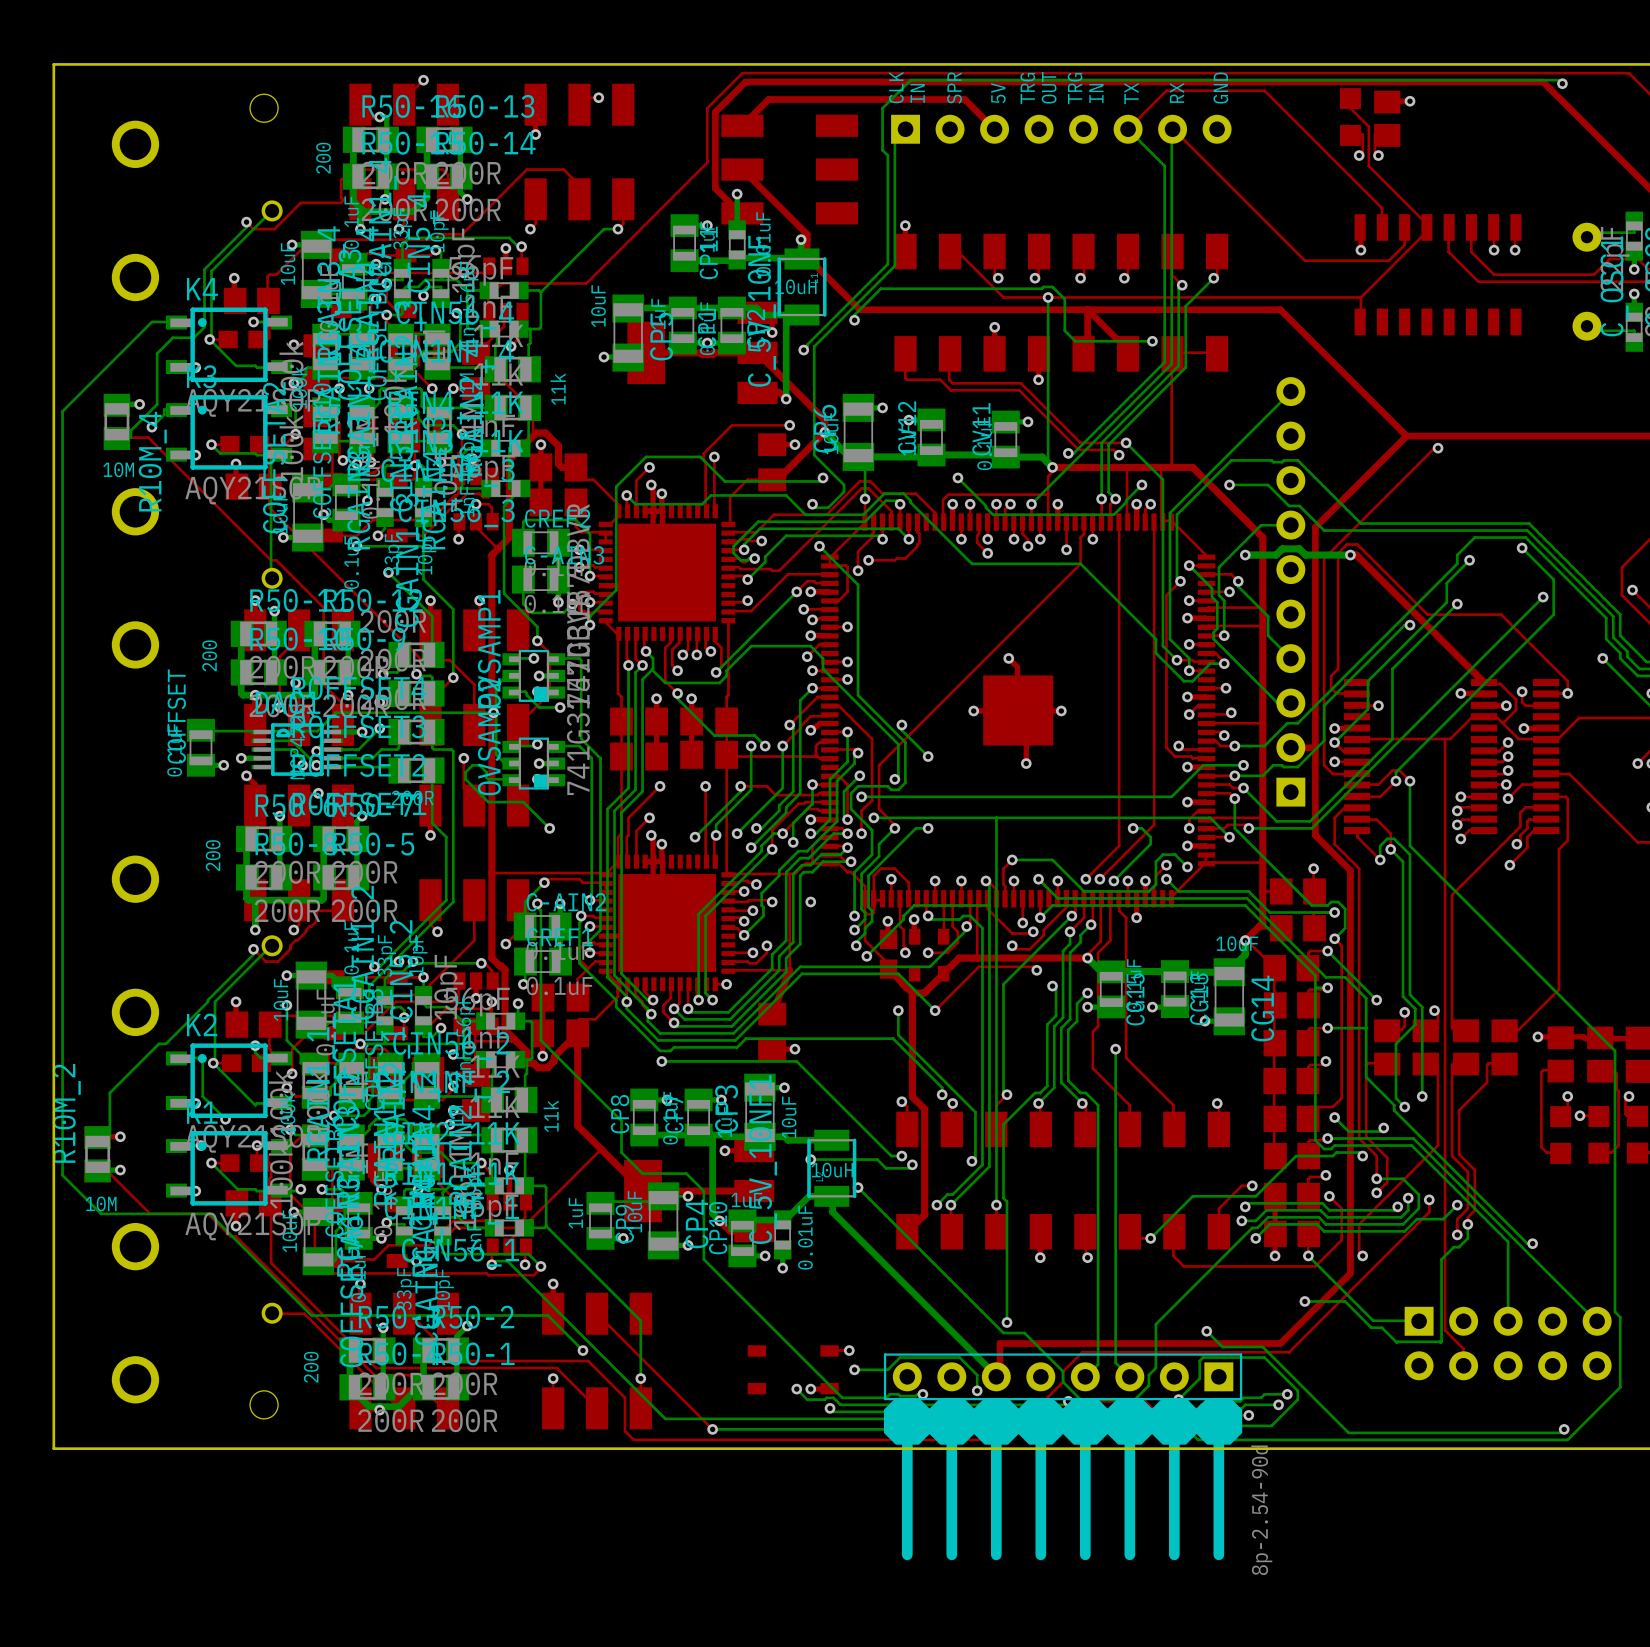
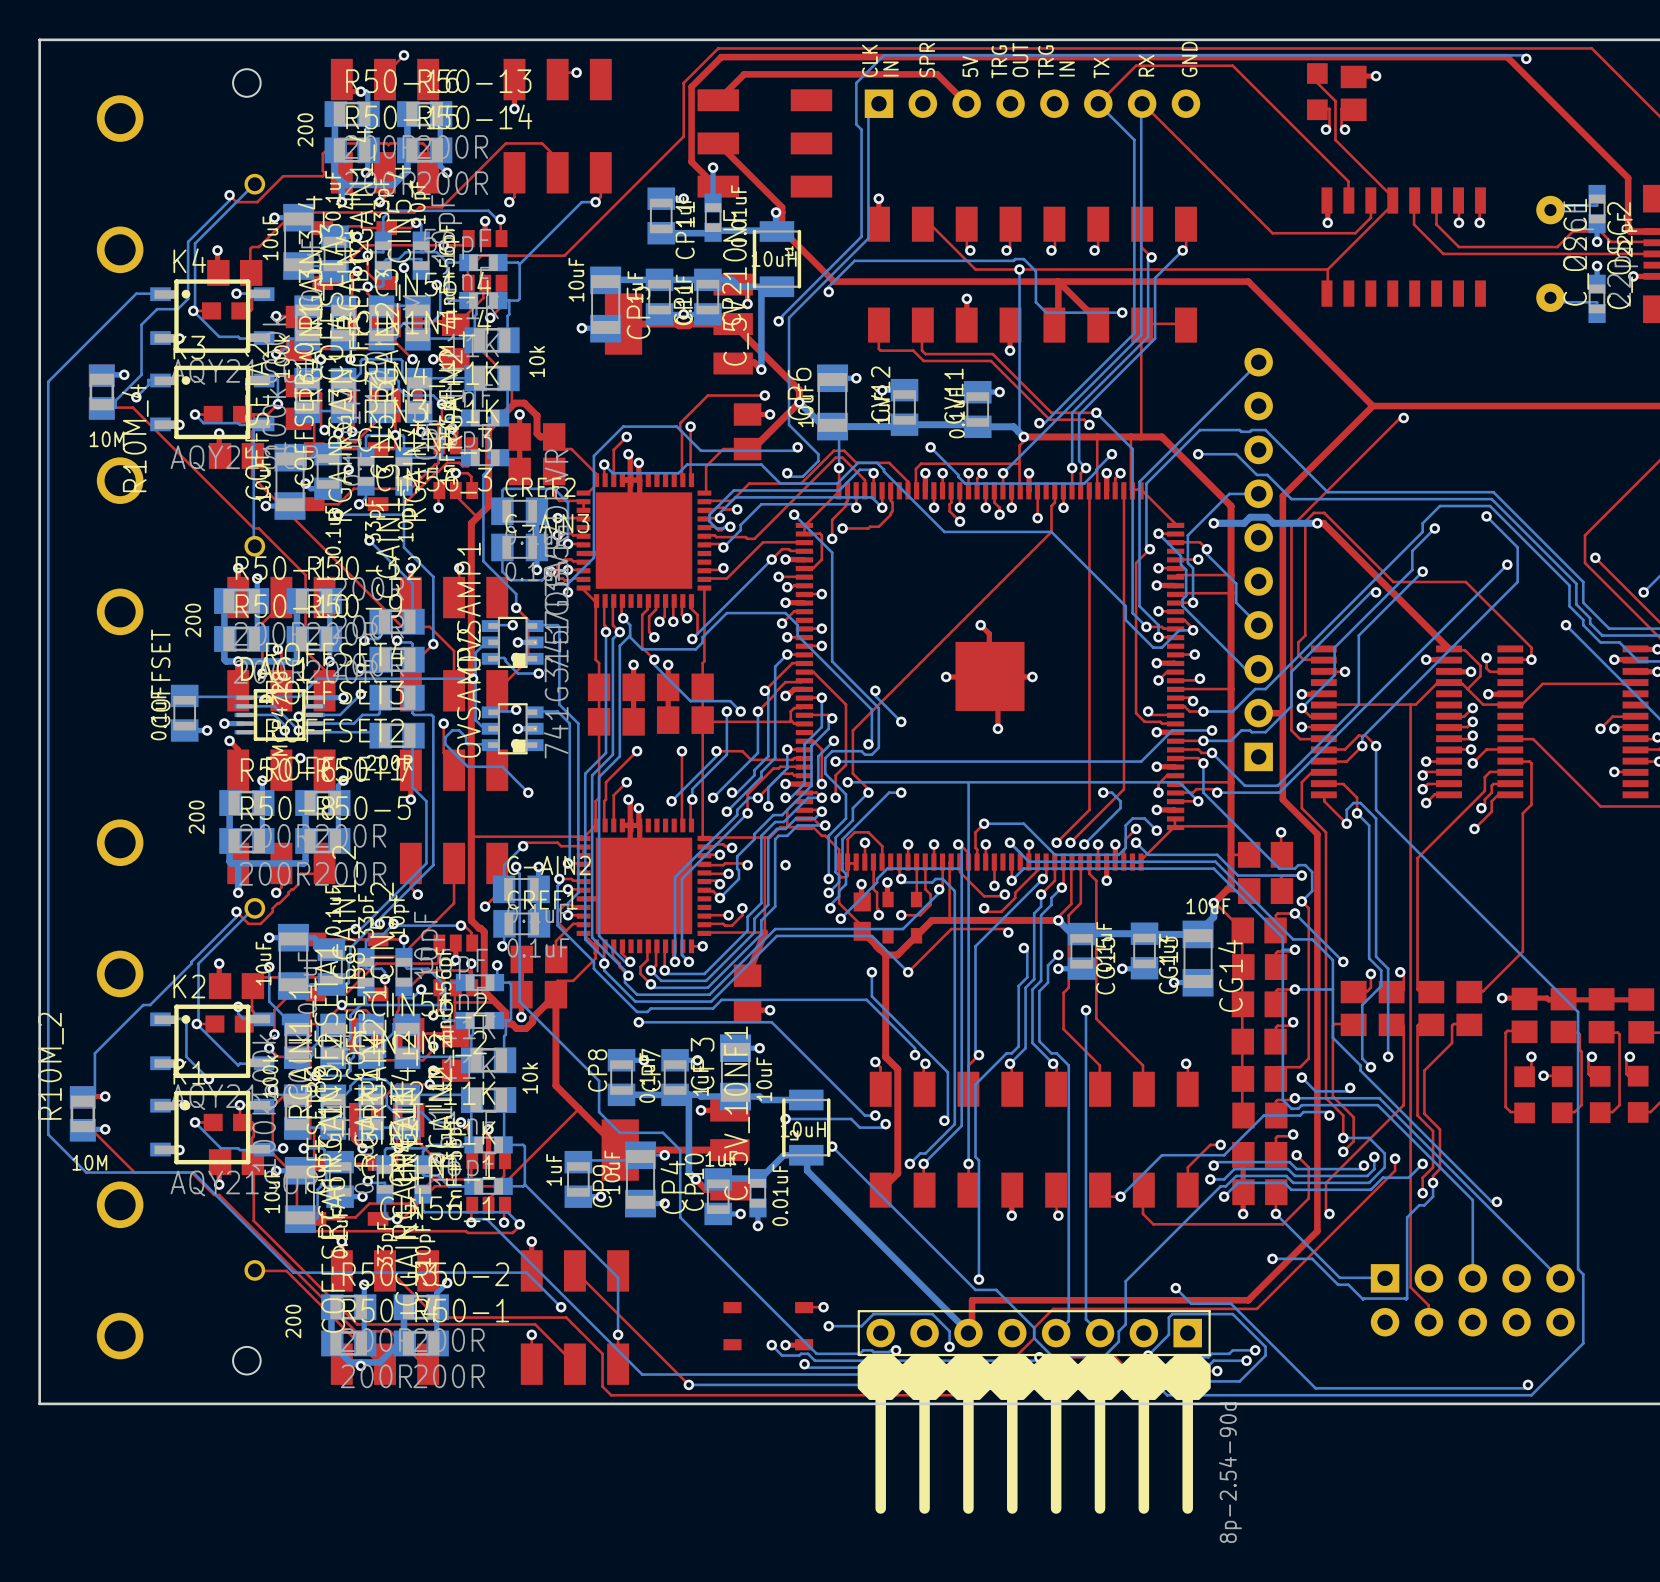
text: 11k (558, 389) -> 10k (537, 361)
text: 11k (551, 1116) -> 10k (530, 1078)

